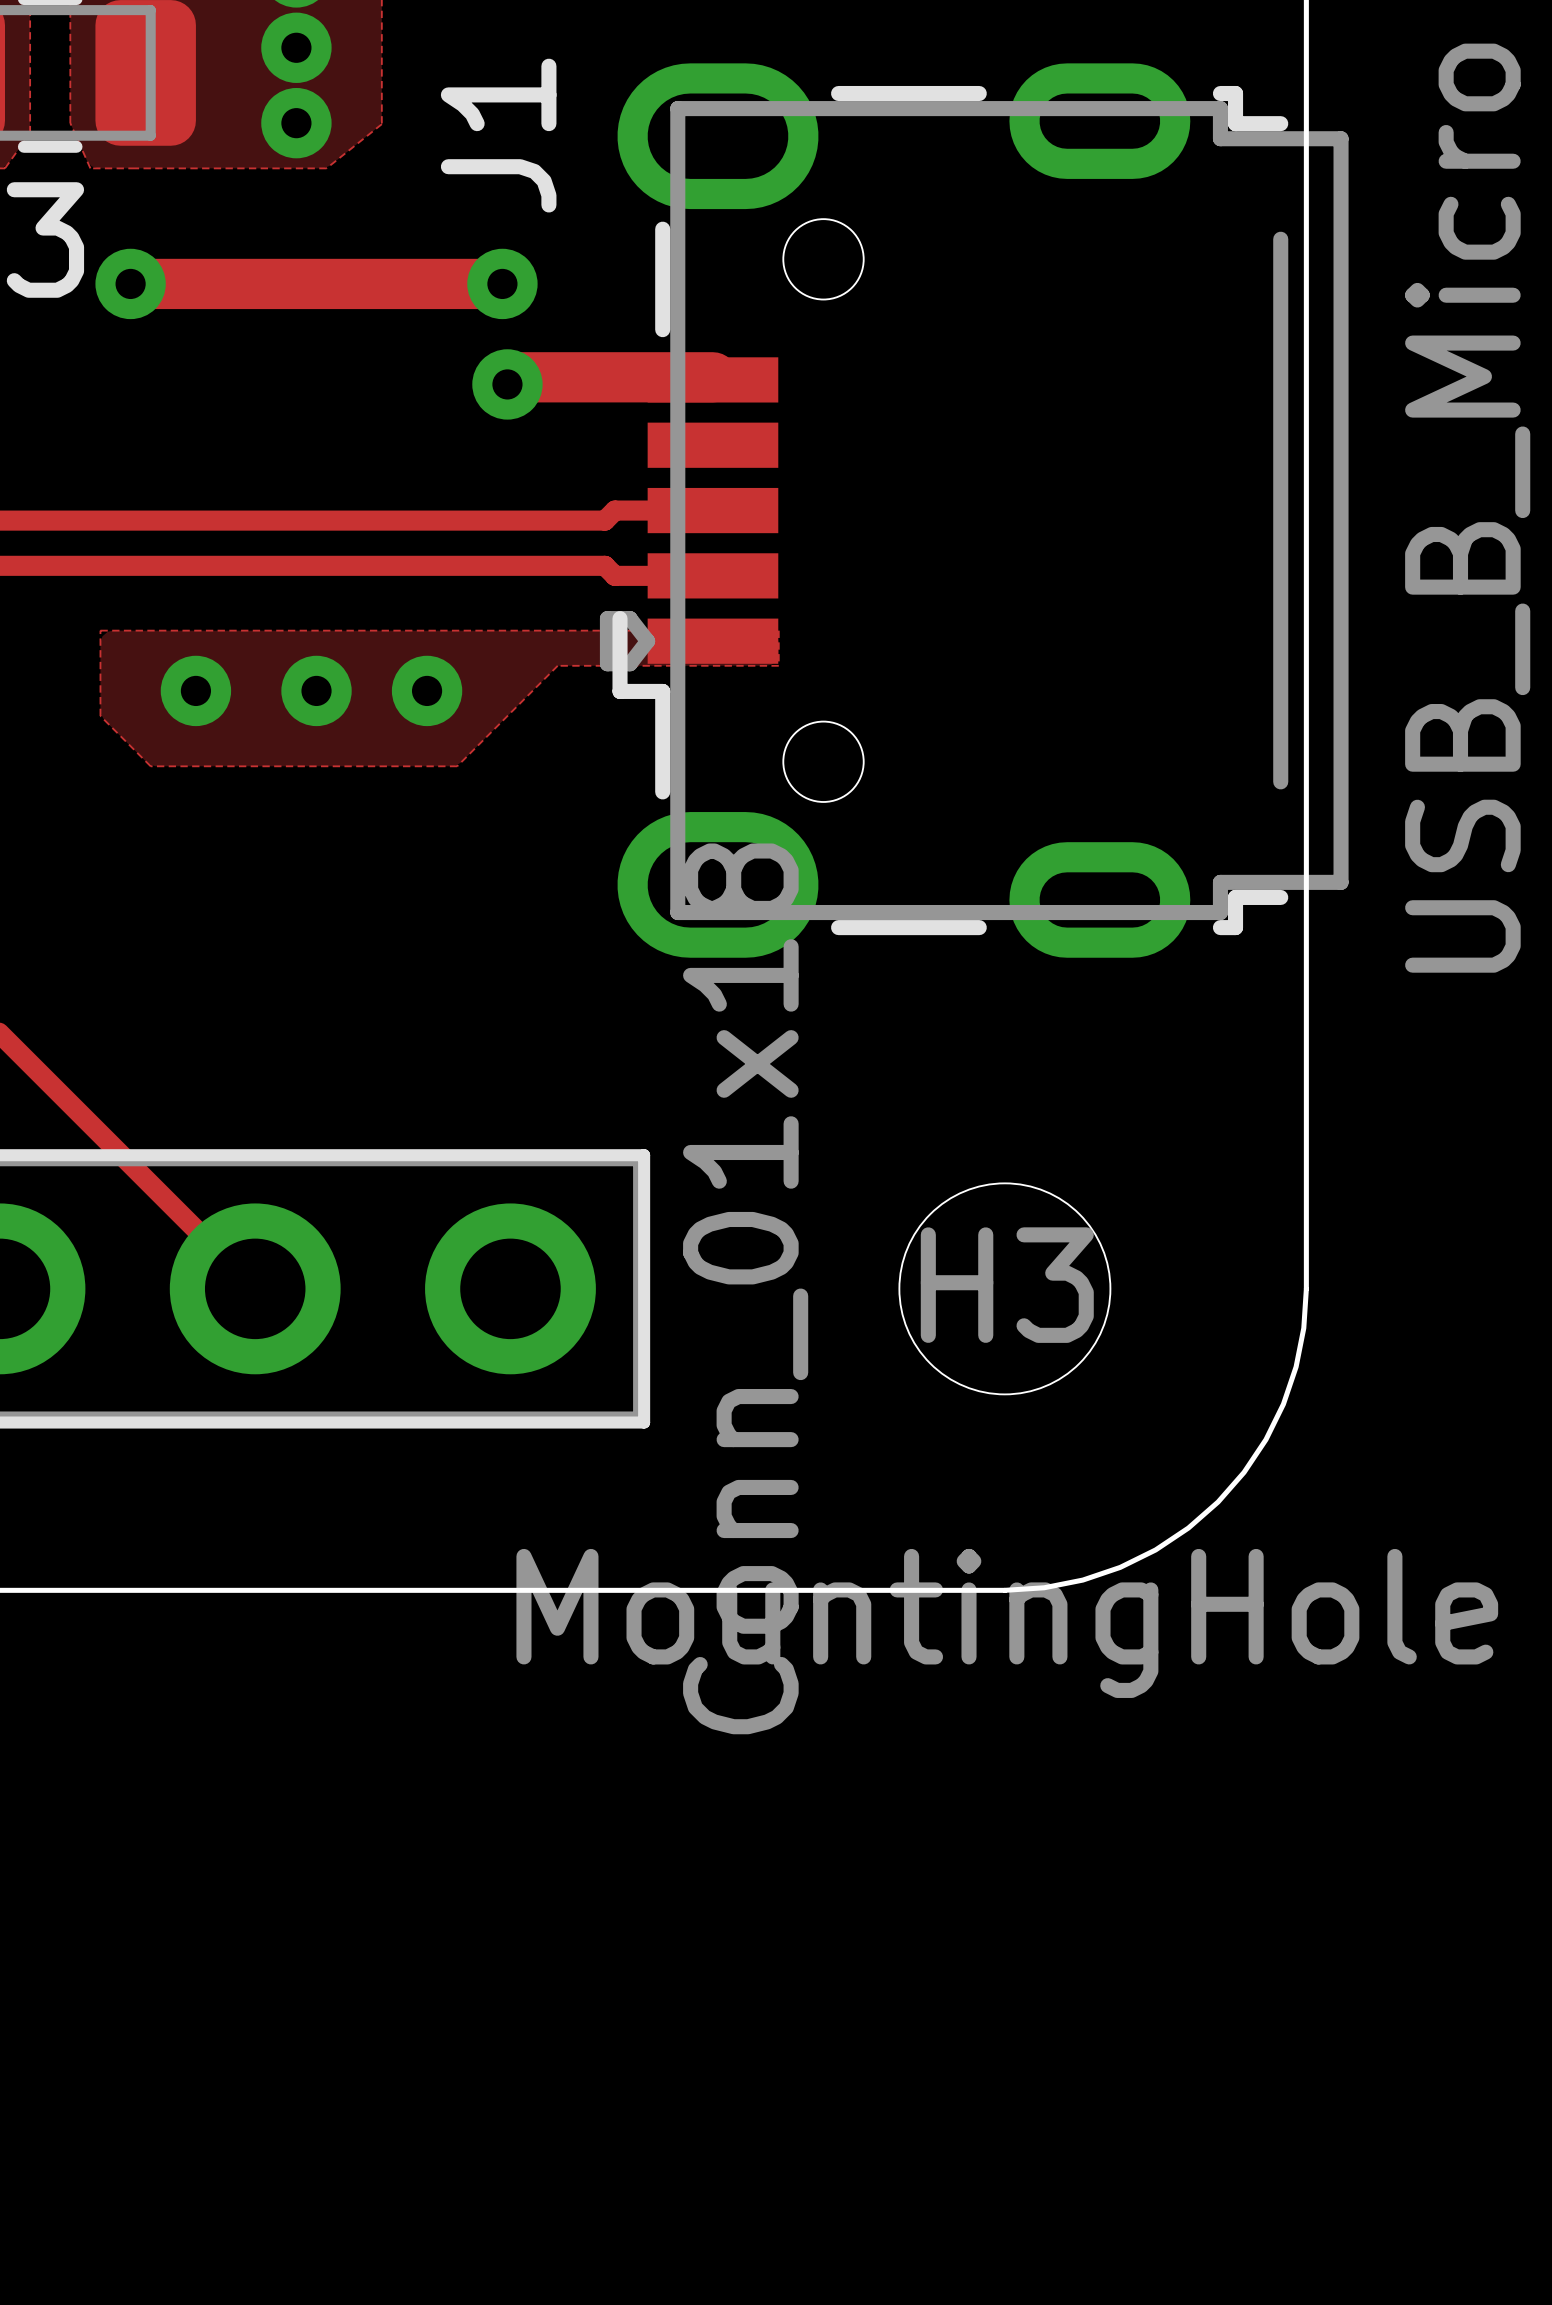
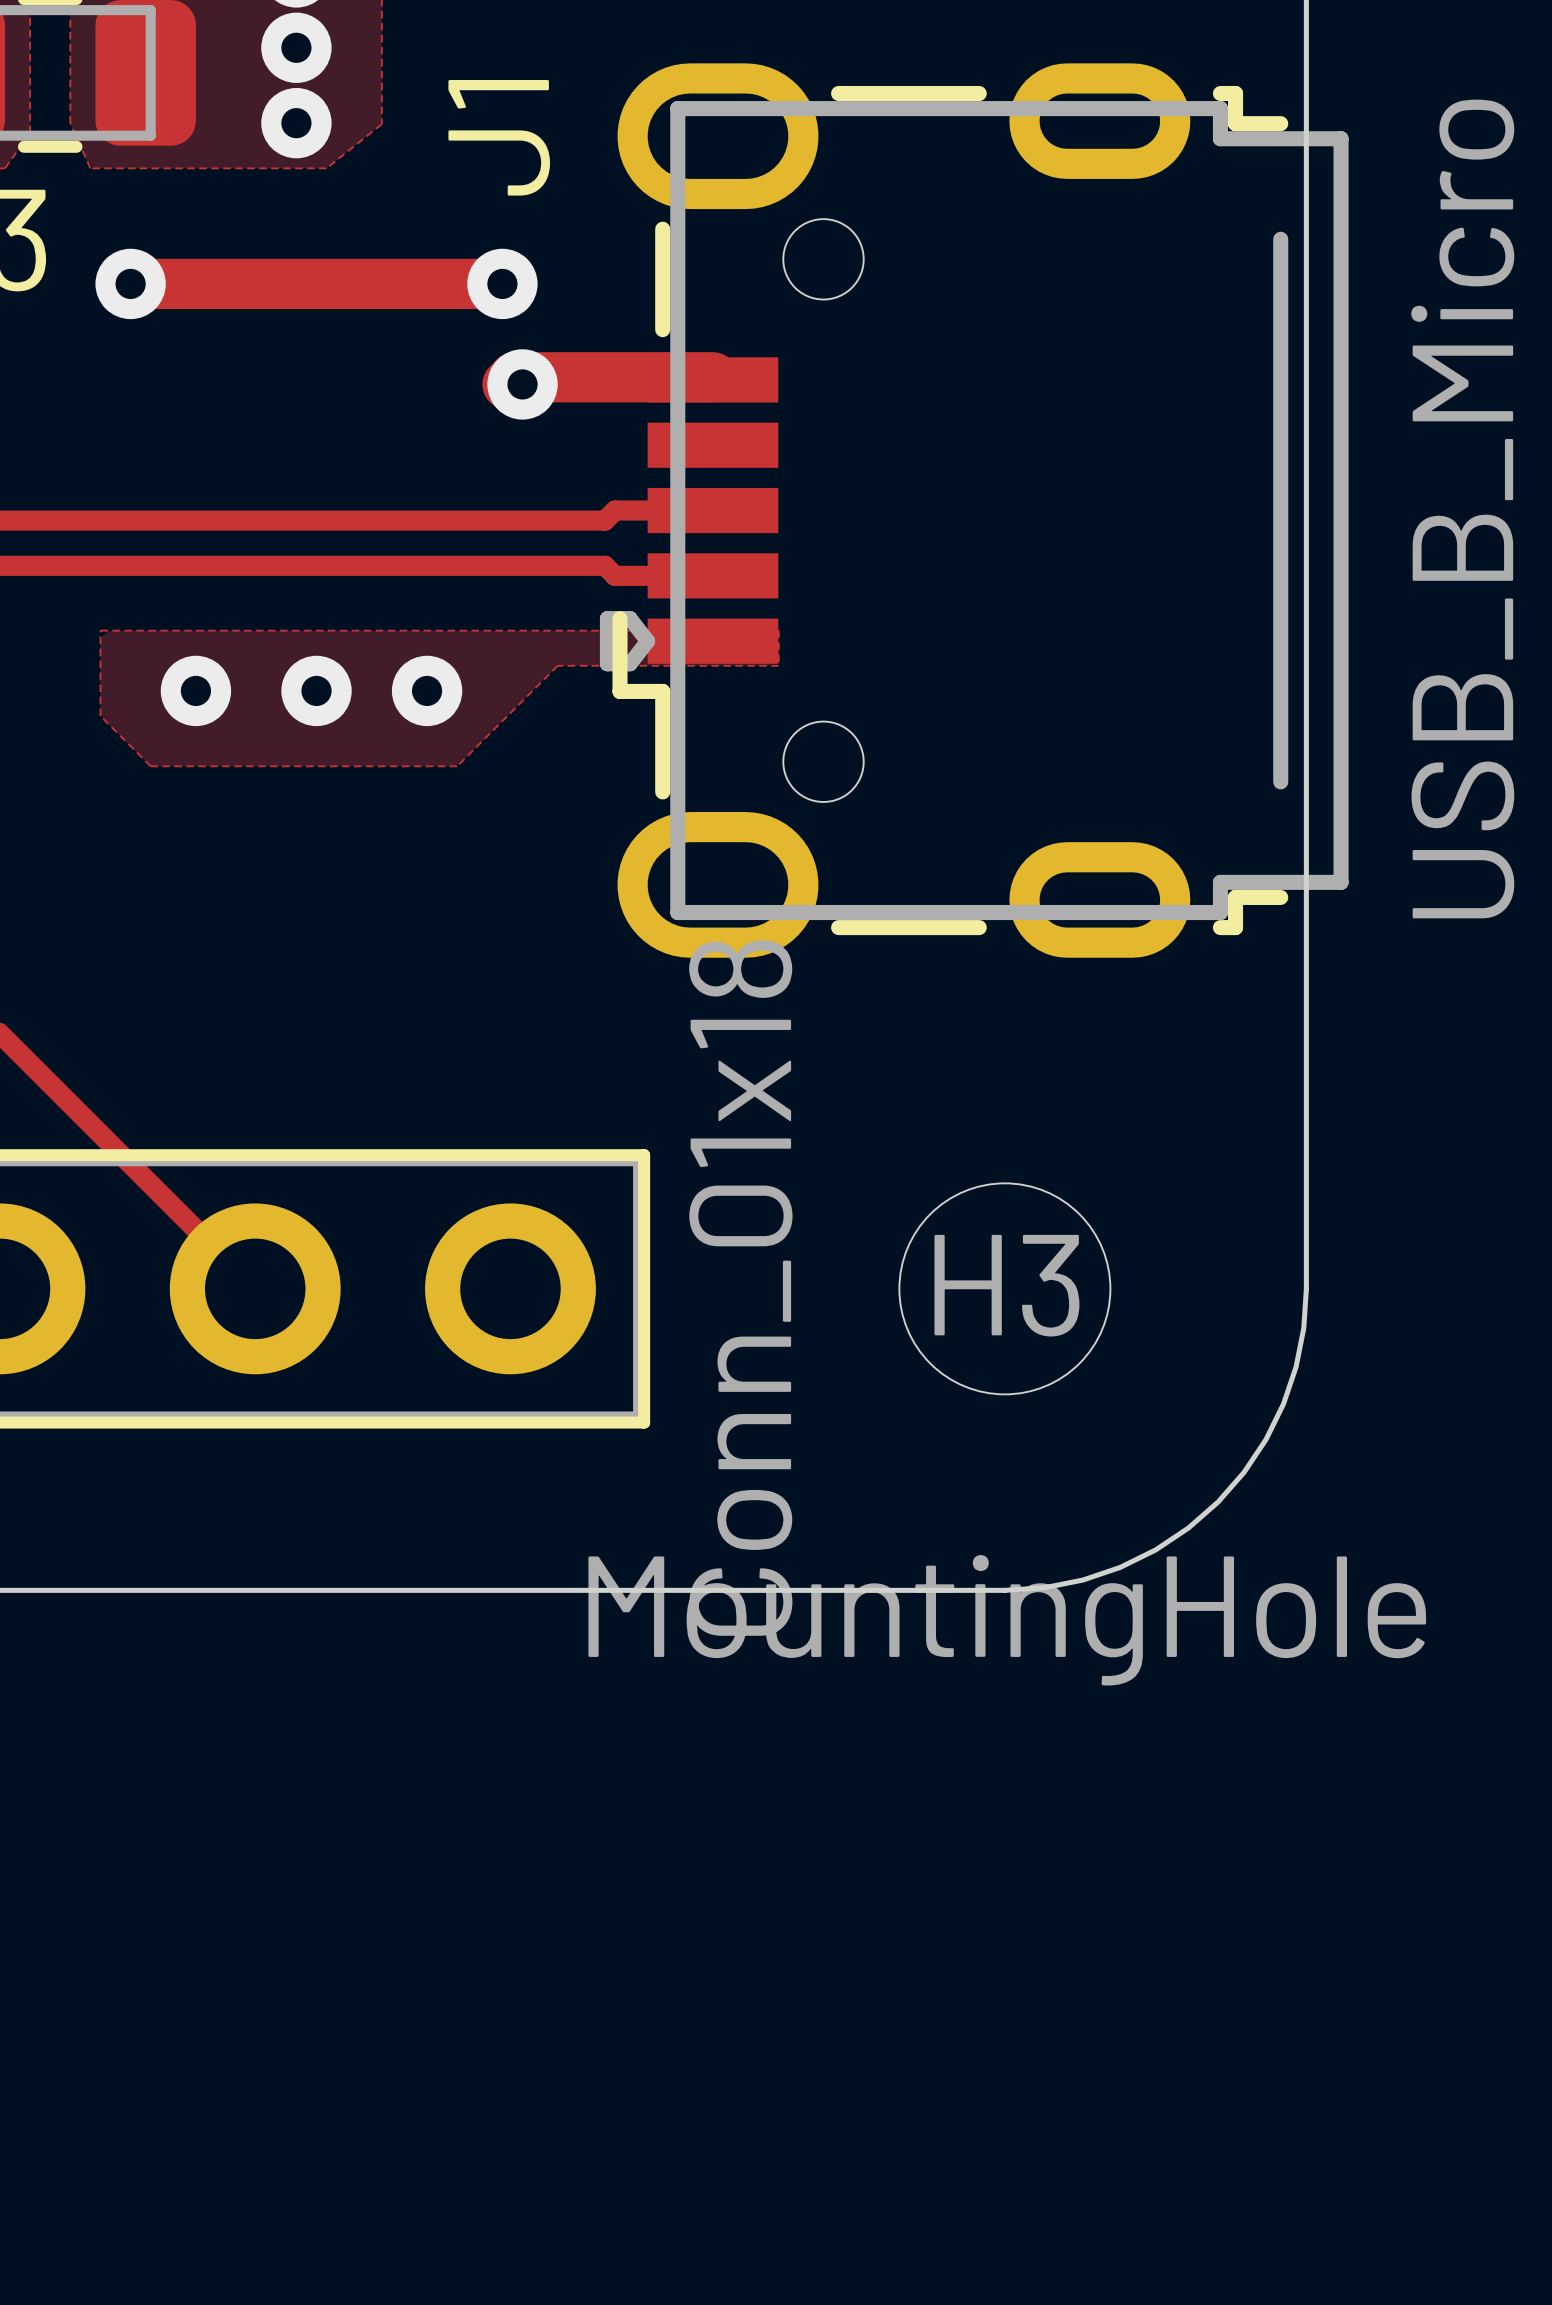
via position: (507, 384) -> (522, 384)

